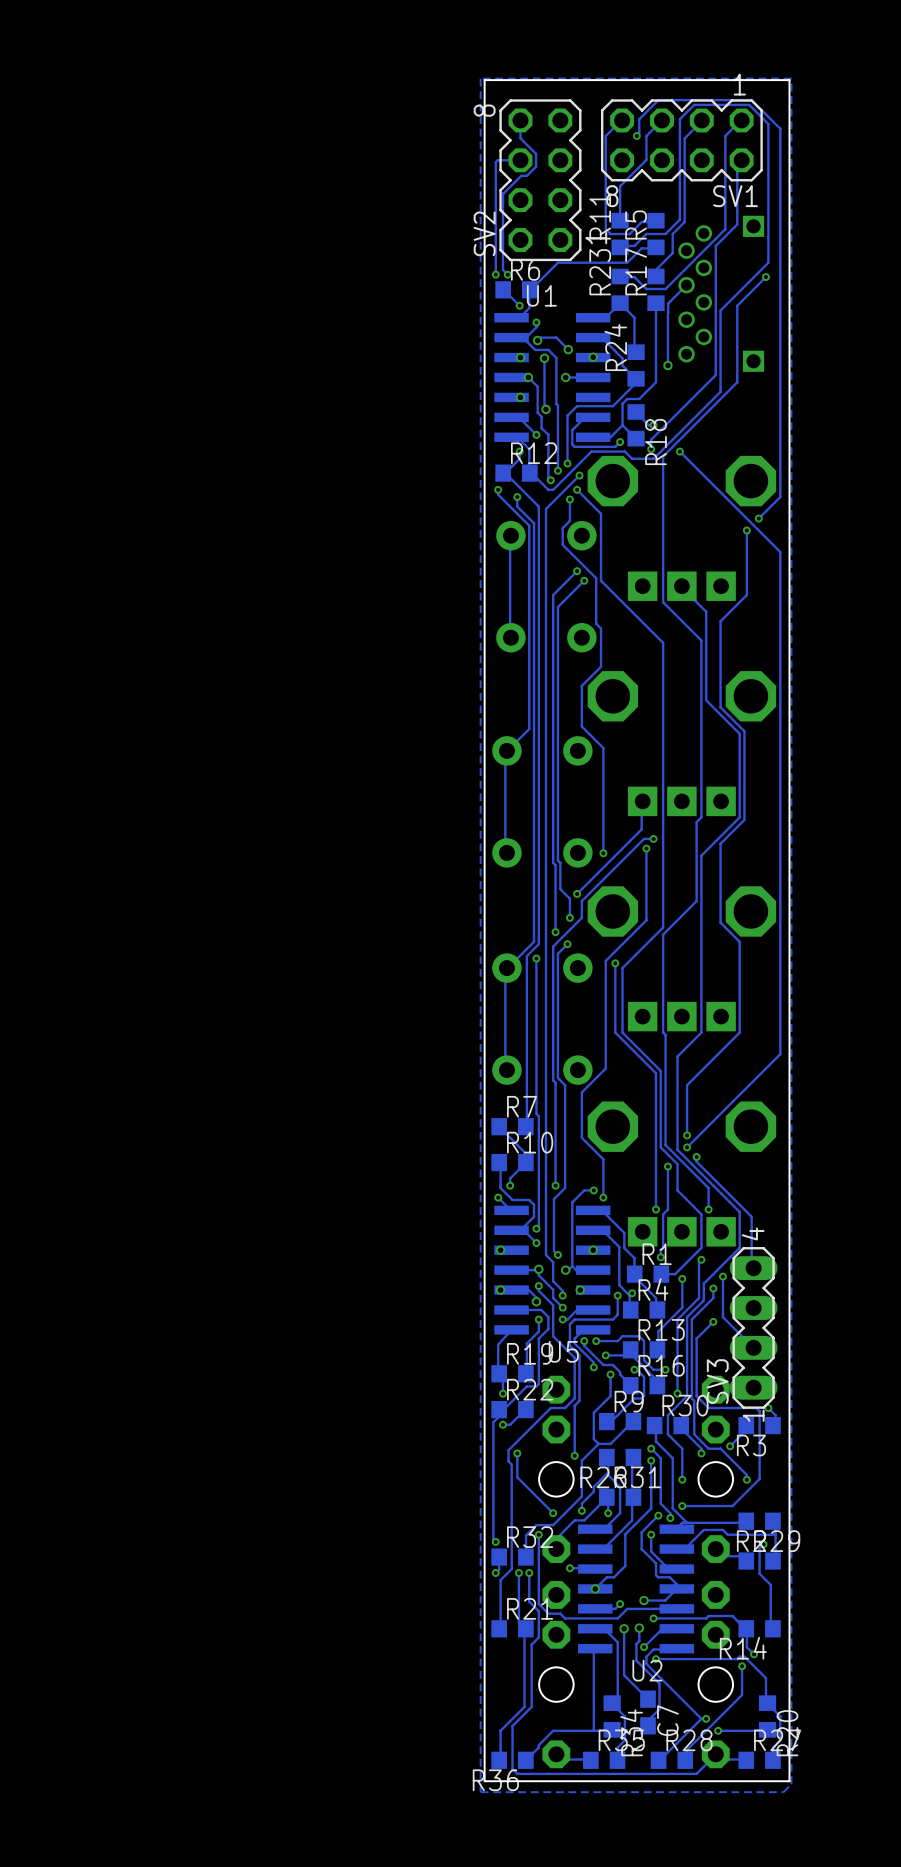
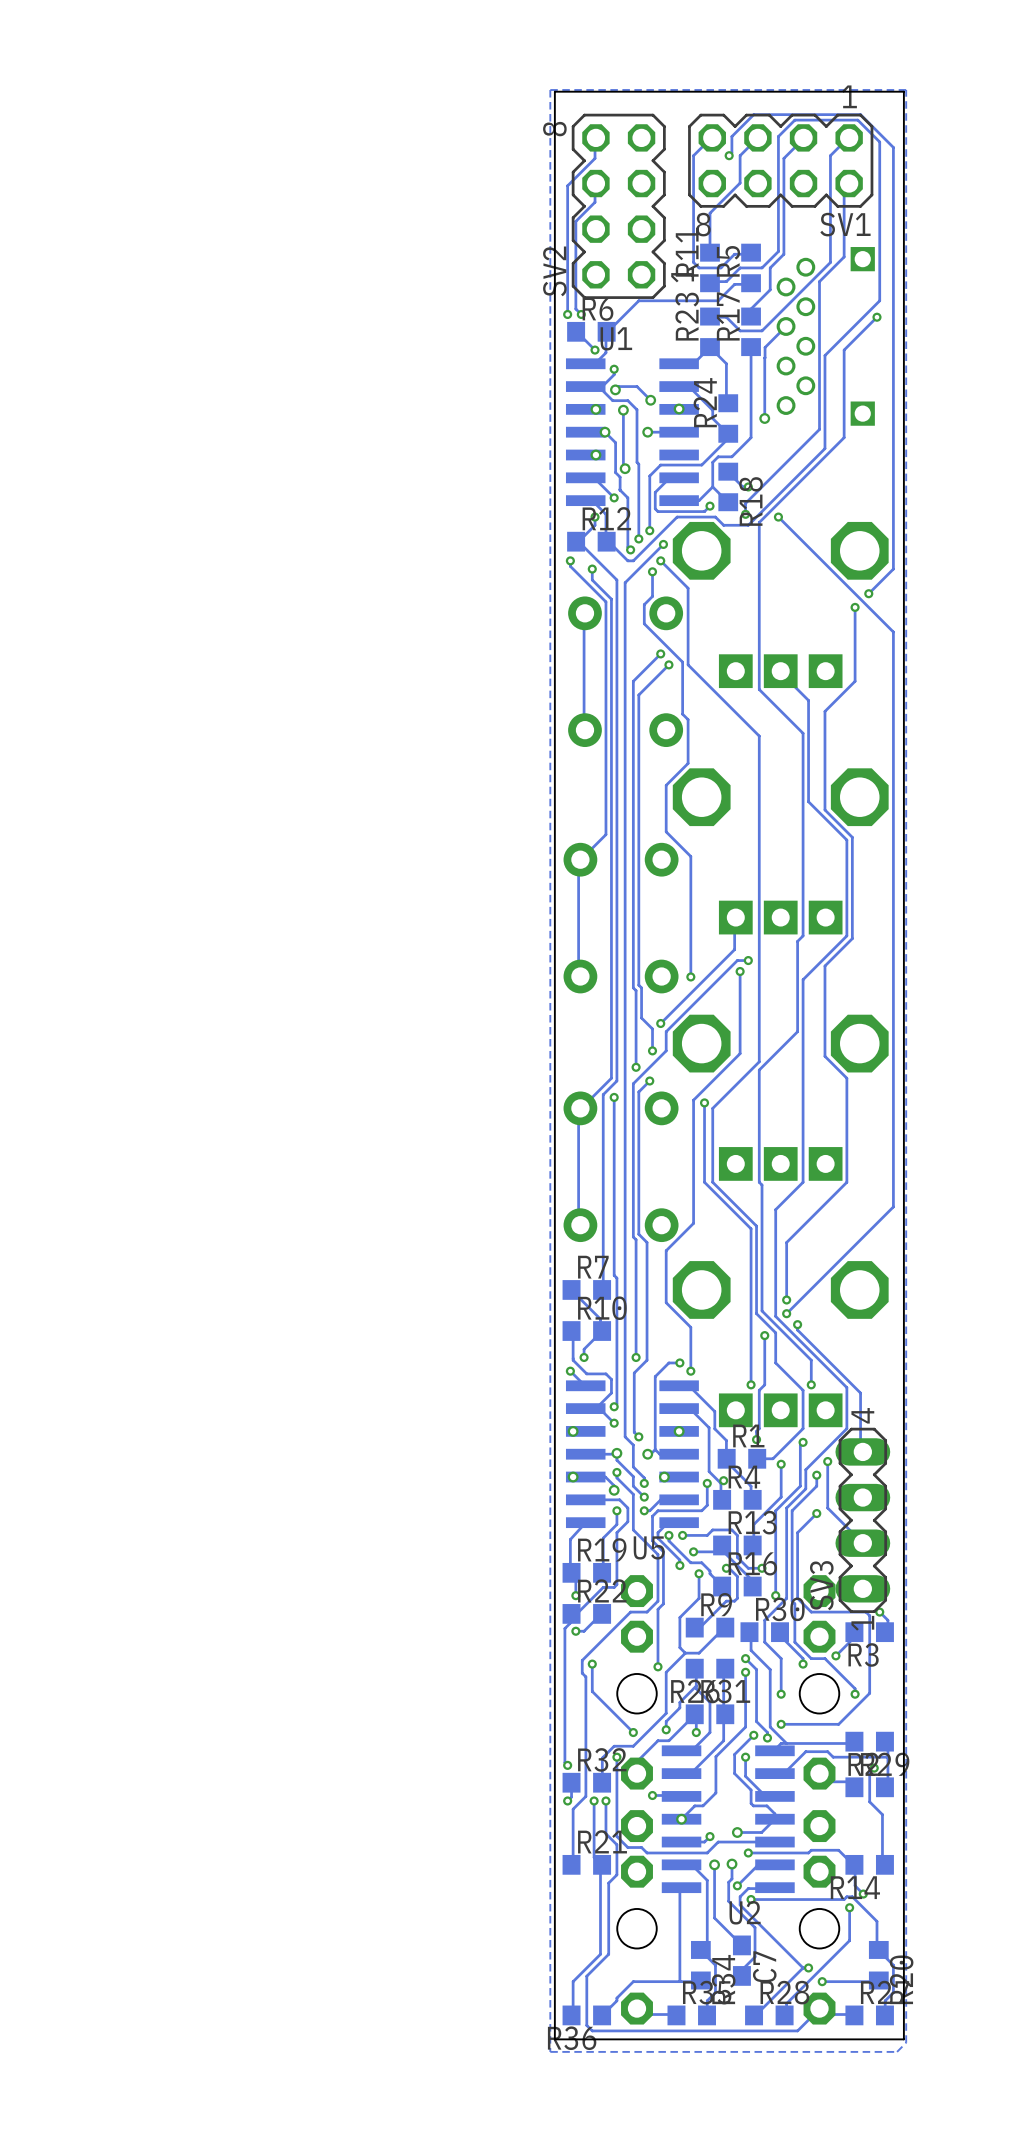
track: (520, 120) (520, 138) (536, 153) (536, 166) (526, 175) (521, 175) (502, 194) -> (595, 137) (595, 158) (569, 183)
track: (520, 160) (497, 160) -> (595, 183) (595, 202) (575, 221)

